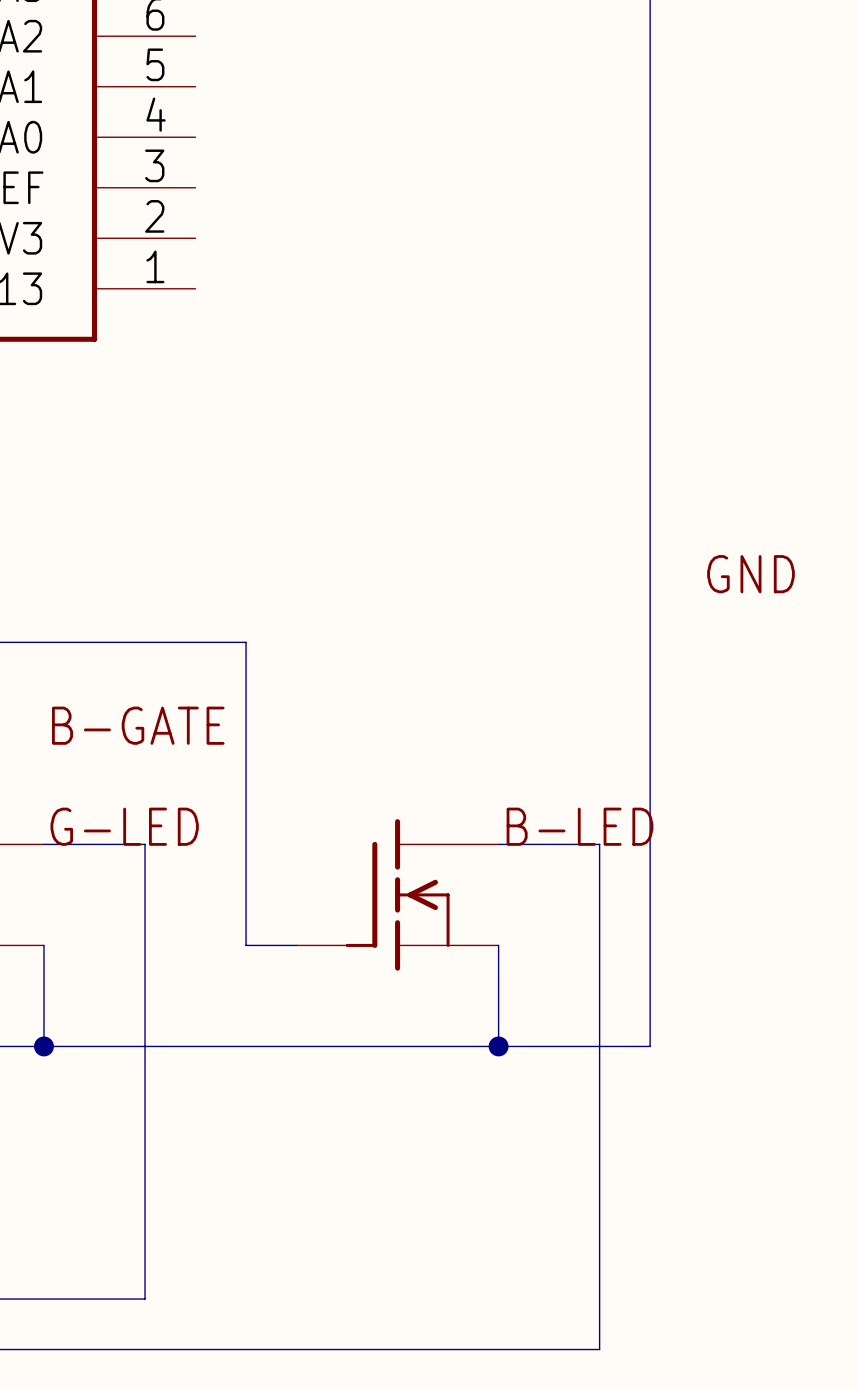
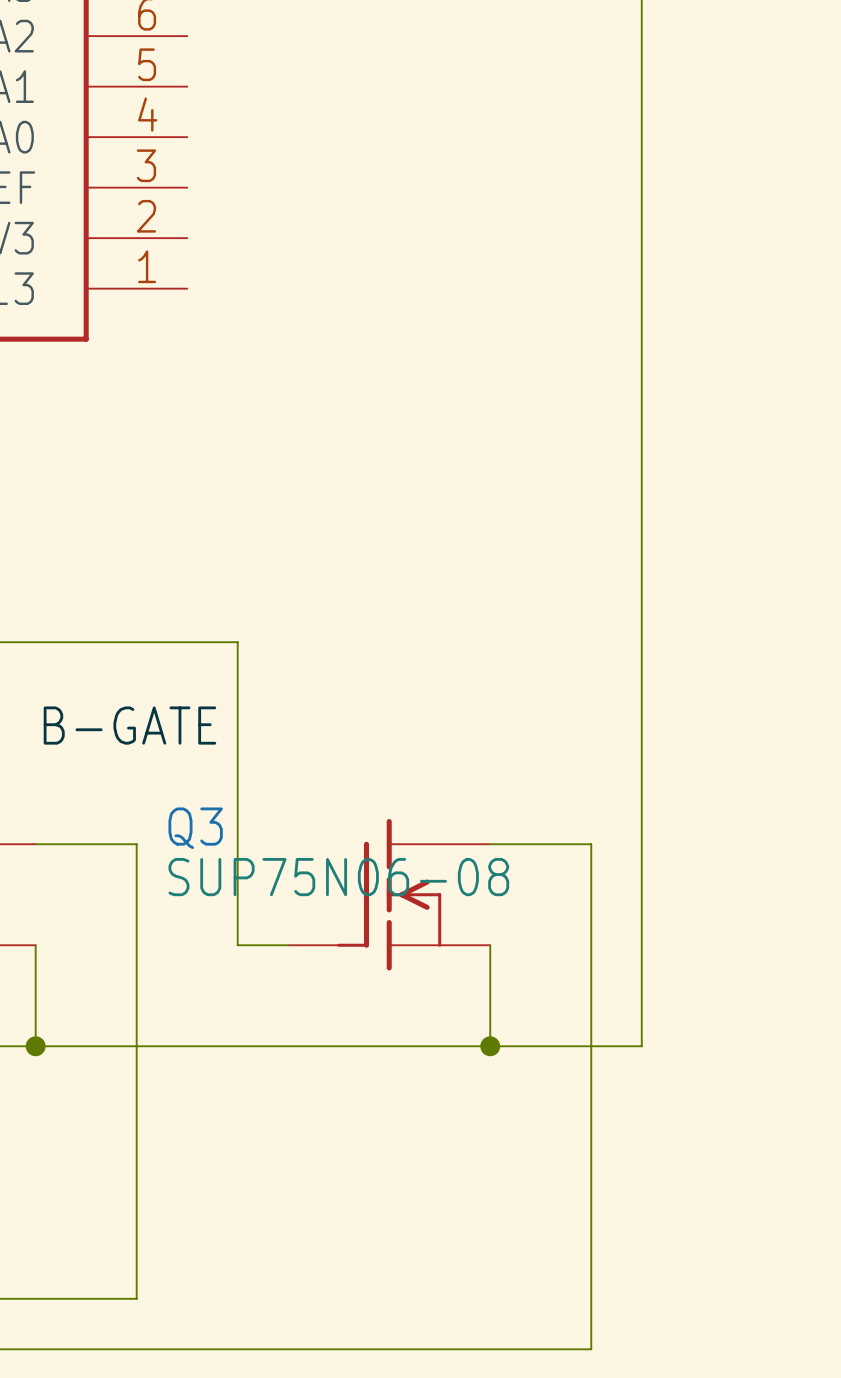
label: GND (750, 574) -> none
label: G-LED (124, 826) -> none
label: B-LED (580, 826) -> none
Q3 name: none -> Q3 (195, 828)
Q3 value: none -> SUP75N06-08 (338, 877)

